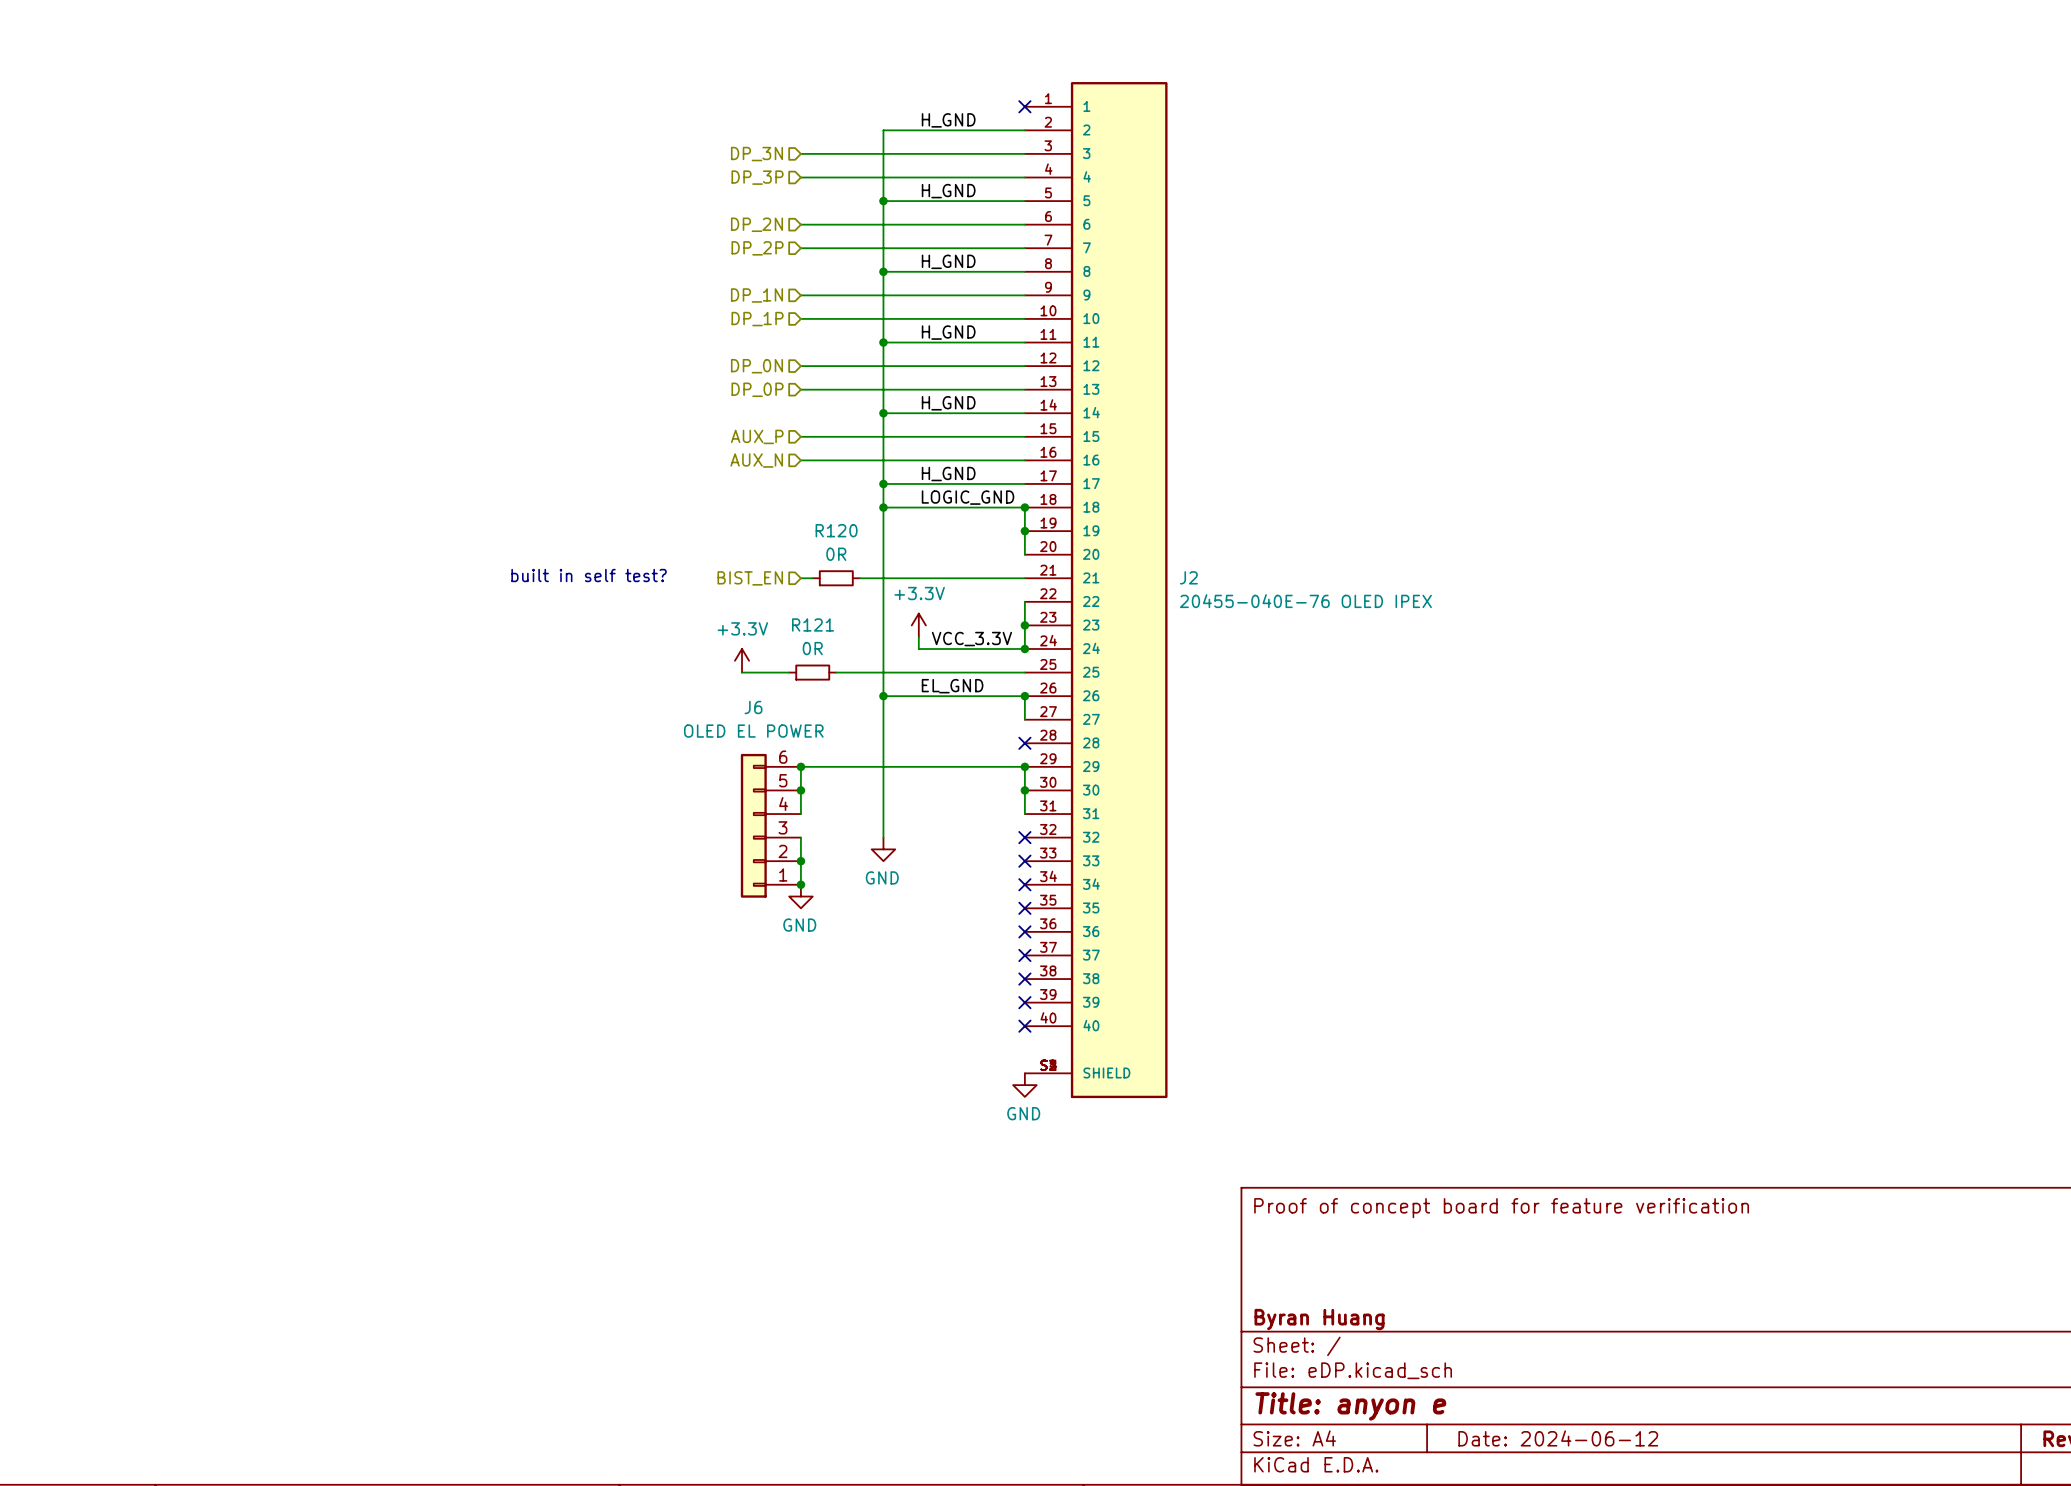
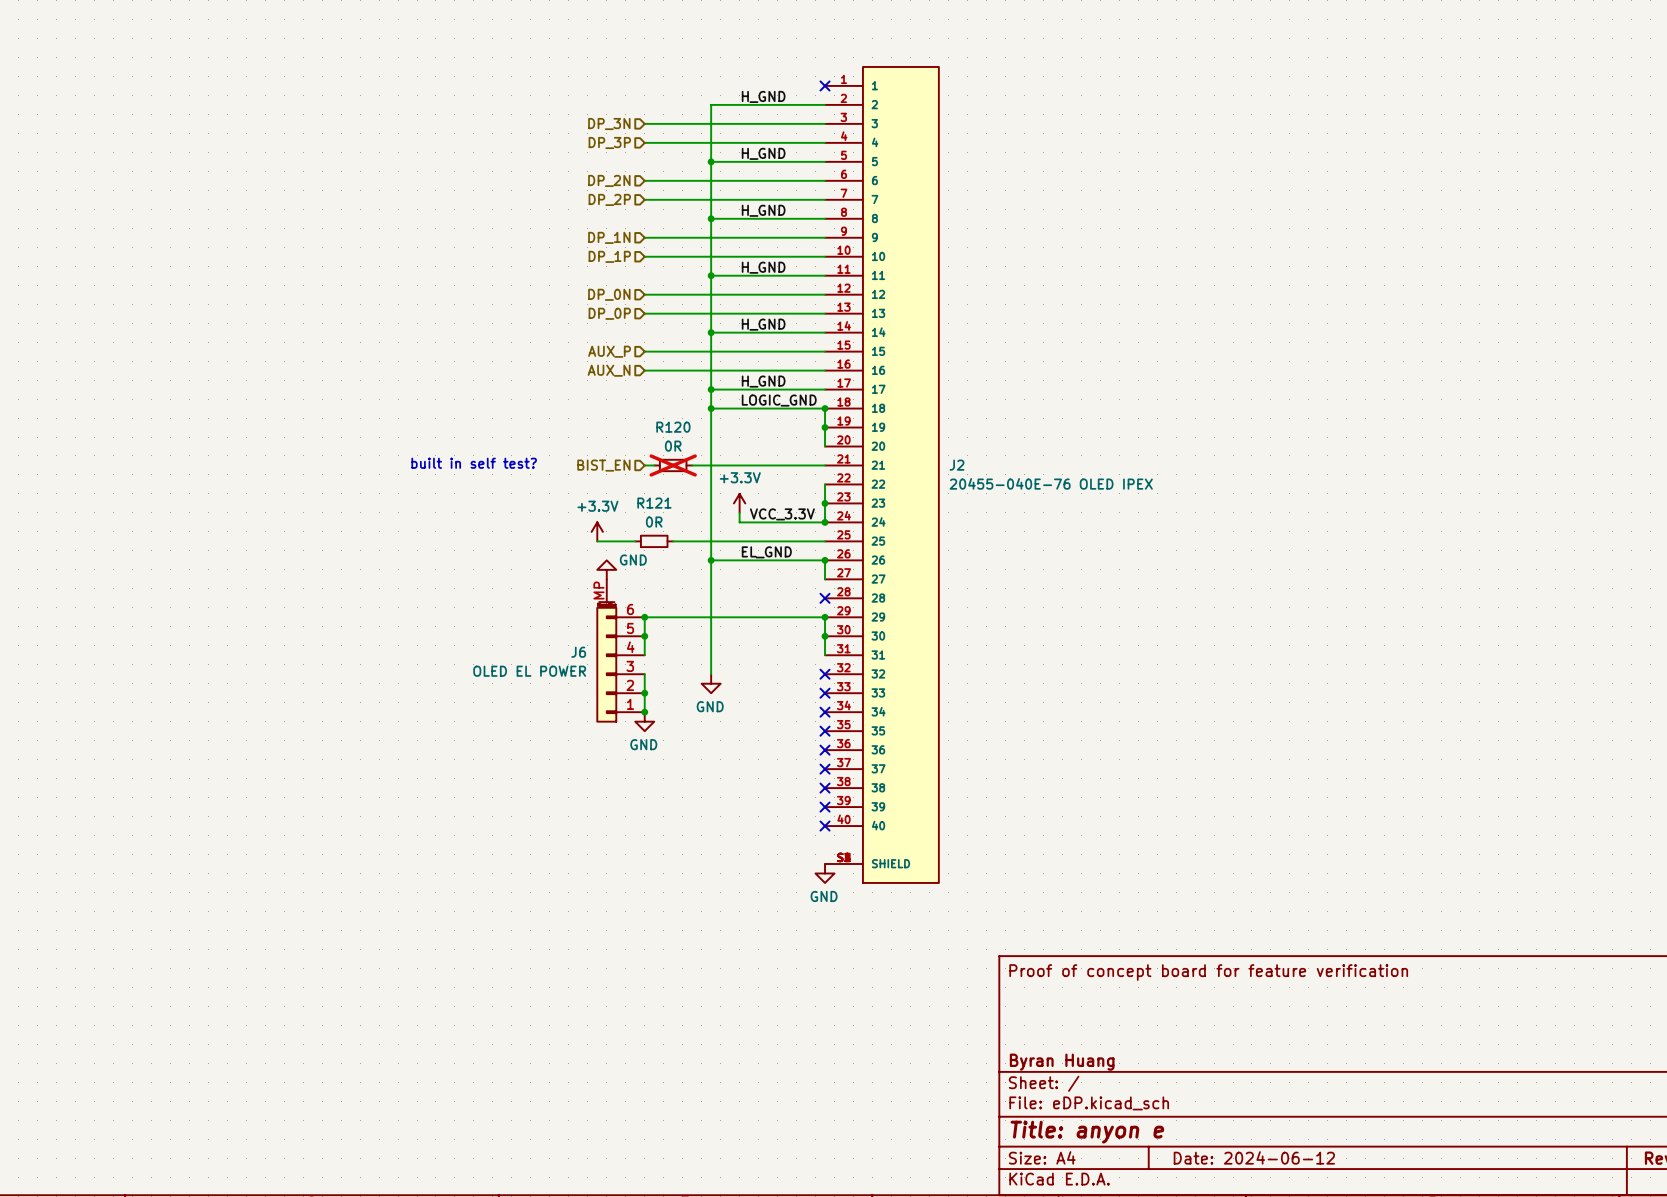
R120 do-not-place cross: none -> (673, 465)
J6 name position: J6 (753, 707) -> J6 (578, 652)
power symbol: none -> GND (606, 569)
J6 value position: OLED EL POWER (753, 731) -> OLED EL POWER (529, 671)
J6 symbol: [740, 753, 801, 898] -> [596, 579, 645, 723]

